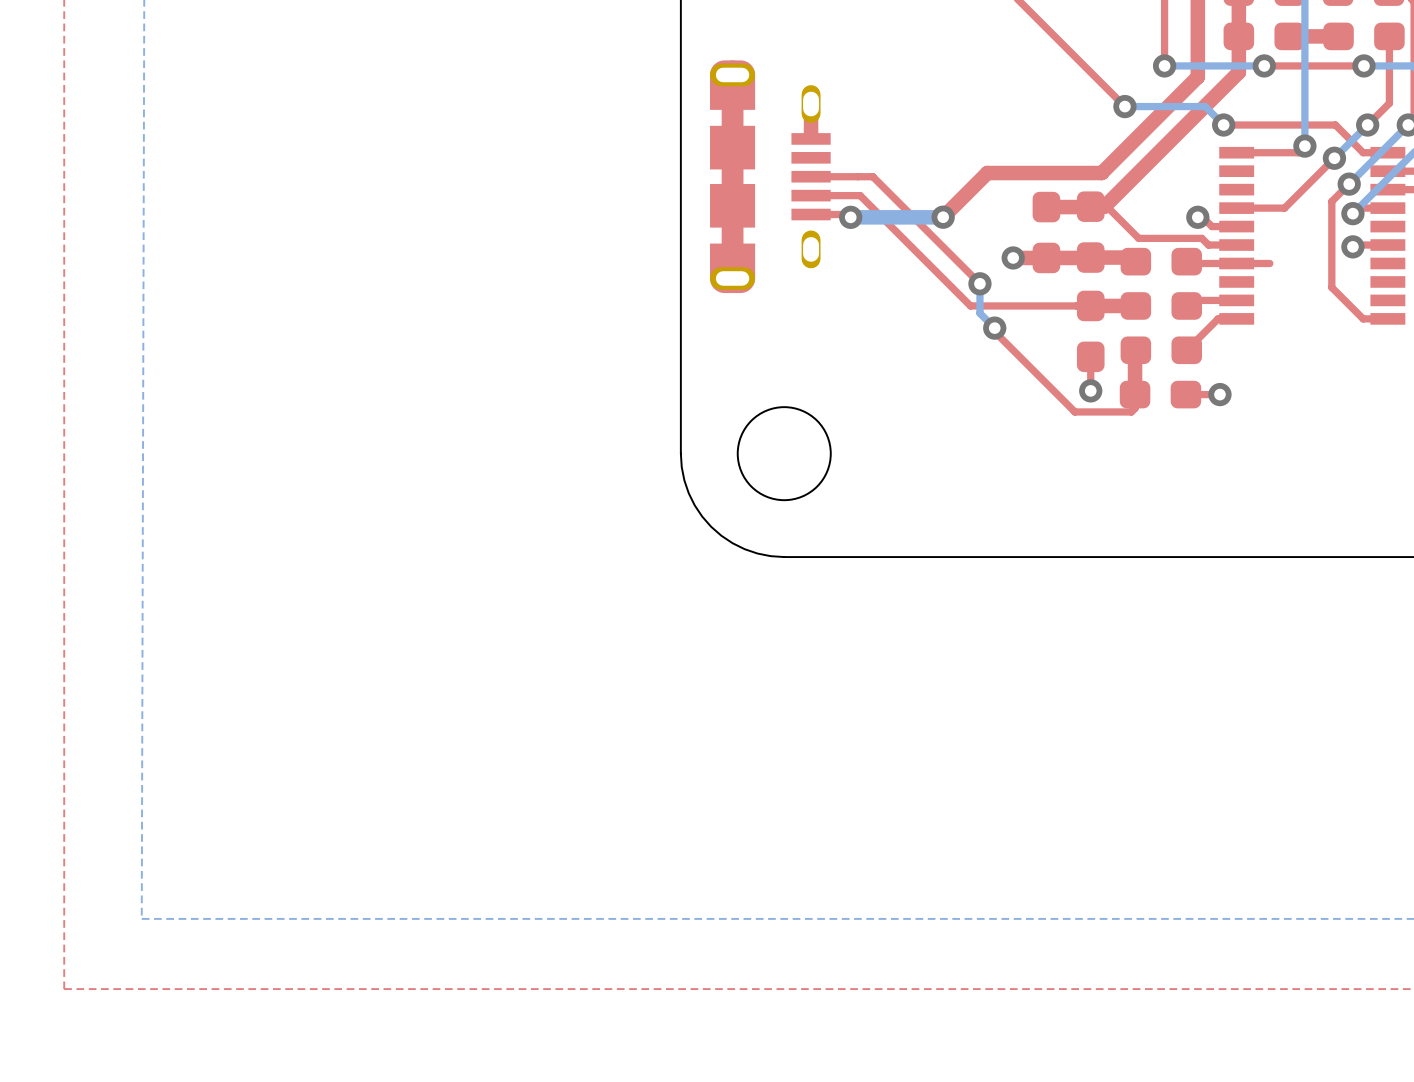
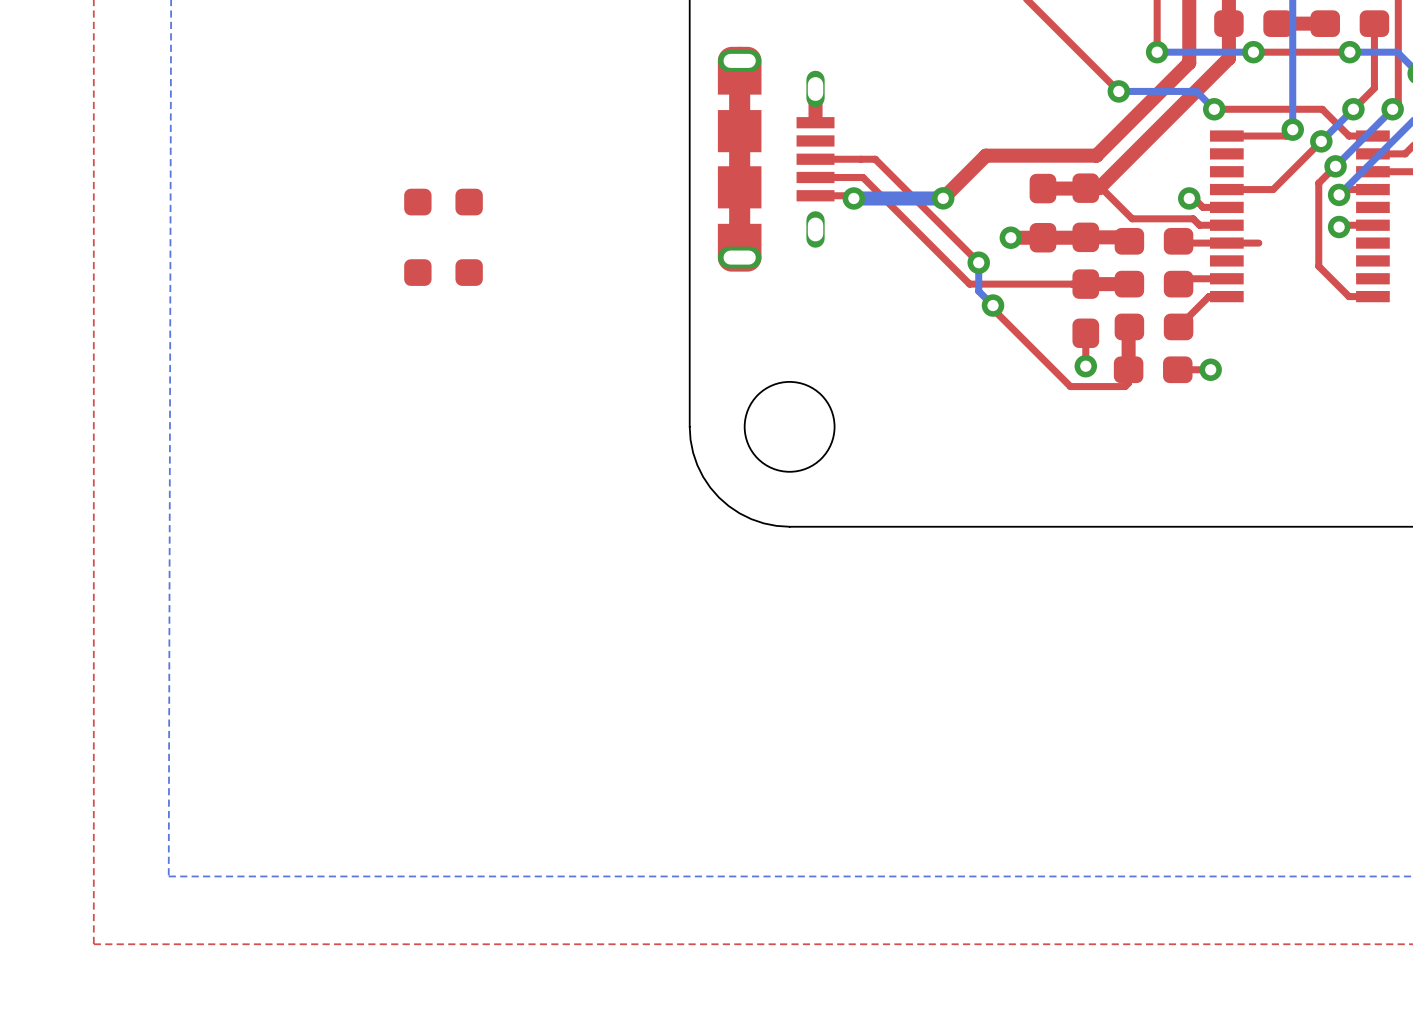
part: none -> (443, 202)
part: none -> (443, 272)

